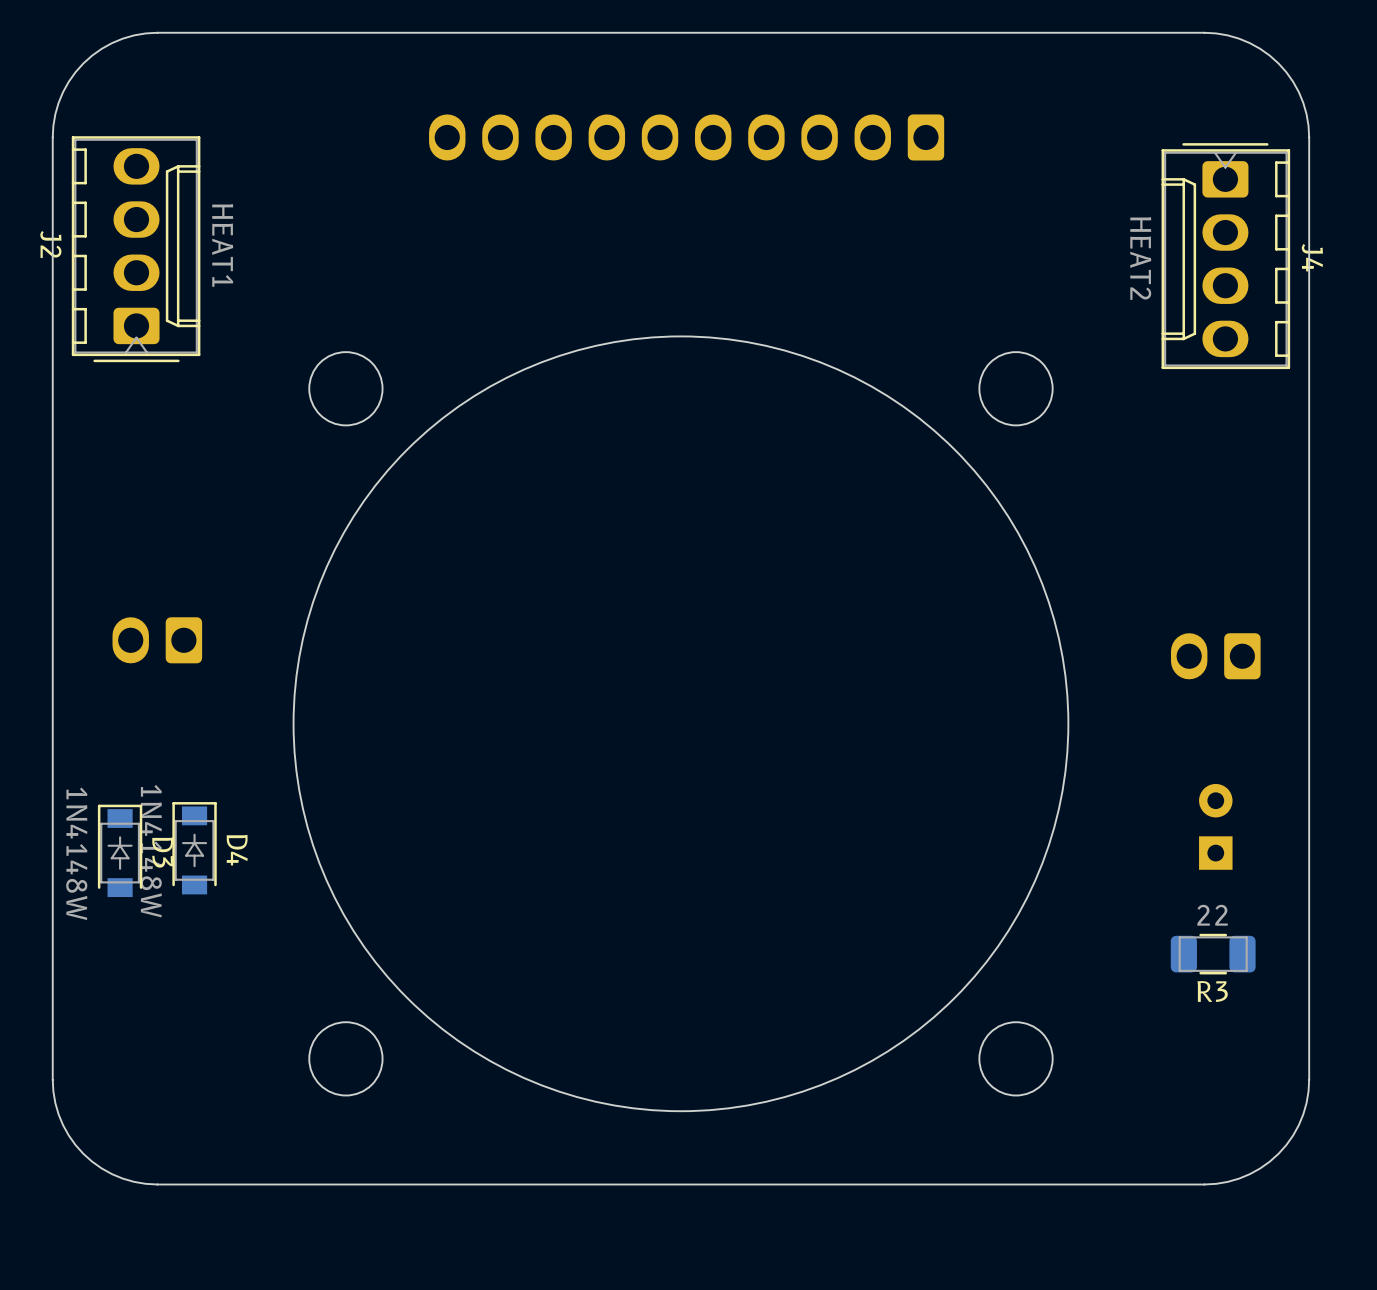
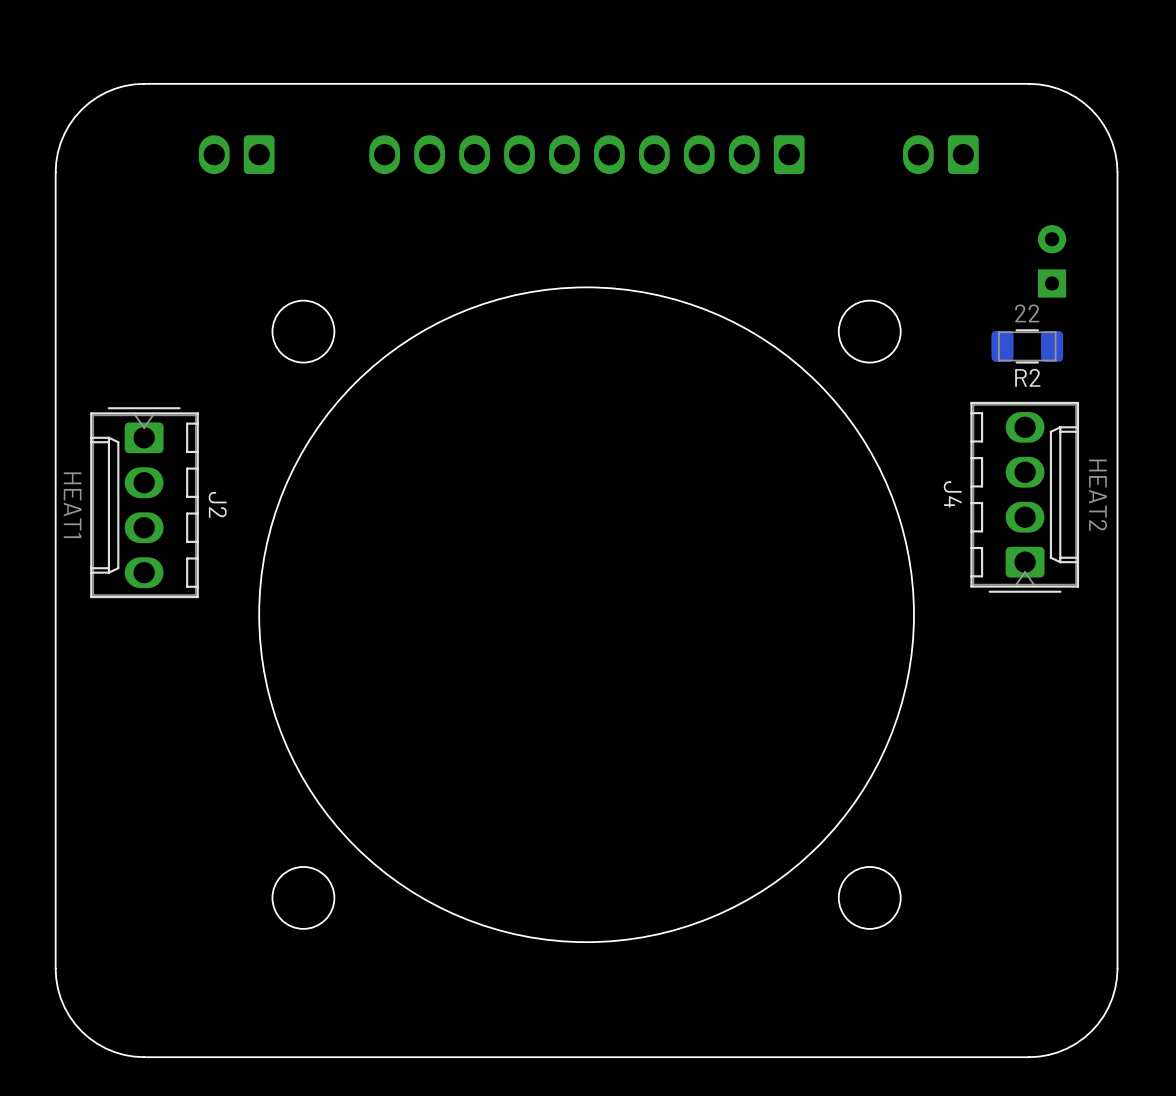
part position: (686, 137) -> (586, 154)
board edge: (1309, 200) (1308, 125) (1303, 102) (1293, 81) (1278, 63) (1260, 48) (1227, 35) (1204, 32) (145, 33) (122, 38) (101, 48) (83, 63) (68, 81) (58, 102) (53, 125) (52, 200) -> (1117, 172) (1112, 143) (1103, 125) (1091, 109) (1076, 97) (1058, 88) (1029, 83) (134, 84) (105, 92) (81, 109) (69, 125) (60, 143) (55, 172)
J2 rotation: 0° (136, 249) -> 180° (144, 502)
J2 position: (136, 249) -> (144, 502)
J4 rotation: 0° (1225, 256) -> 180° (1024, 497)
J4 position: (1225, 256) -> (1024, 497)
R2: none -> 22 (1027, 346)
part position: (157, 640) -> (236, 154)
part position: (1215, 656) -> (940, 154)
part position: (1215, 826) -> (1052, 261)
D4: 1N4148W (194, 848) -> none
D3: 1N4148W (120, 850) -> none
R3: 22 (1213, 954) -> none
board edge: (1309, 1079) (1303, 1114) (1293, 1135) (1278, 1153) (1260, 1168) (1239, 1178) (1204, 1184) (145, 1183) (112, 1174) (83, 1153) (68, 1135) (58, 1114) (52, 1079) -> (1117, 915) (1116, 978) (1112, 997) (1103, 1015) (1091, 1031) (1076, 1043) (1048, 1054) (1029, 1057) (134, 1056) (114, 1052) (97, 1043) (81, 1031) (69, 1015) (60, 997) (56, 978) (55, 915)

